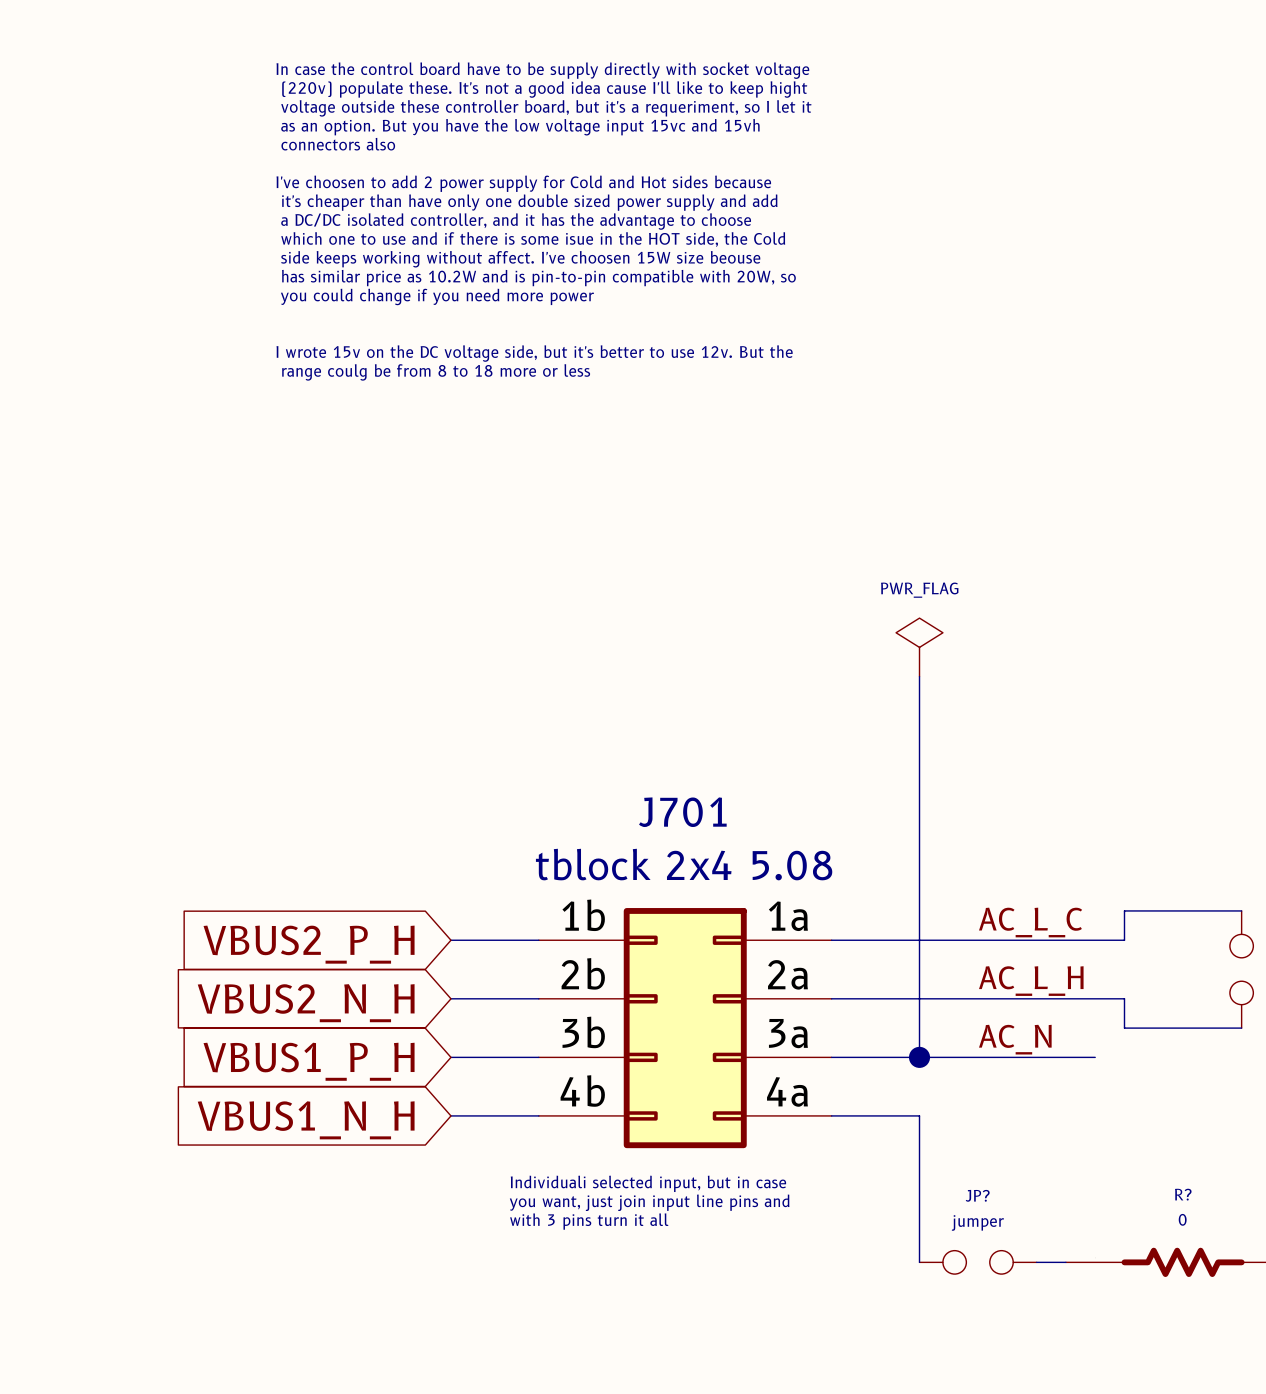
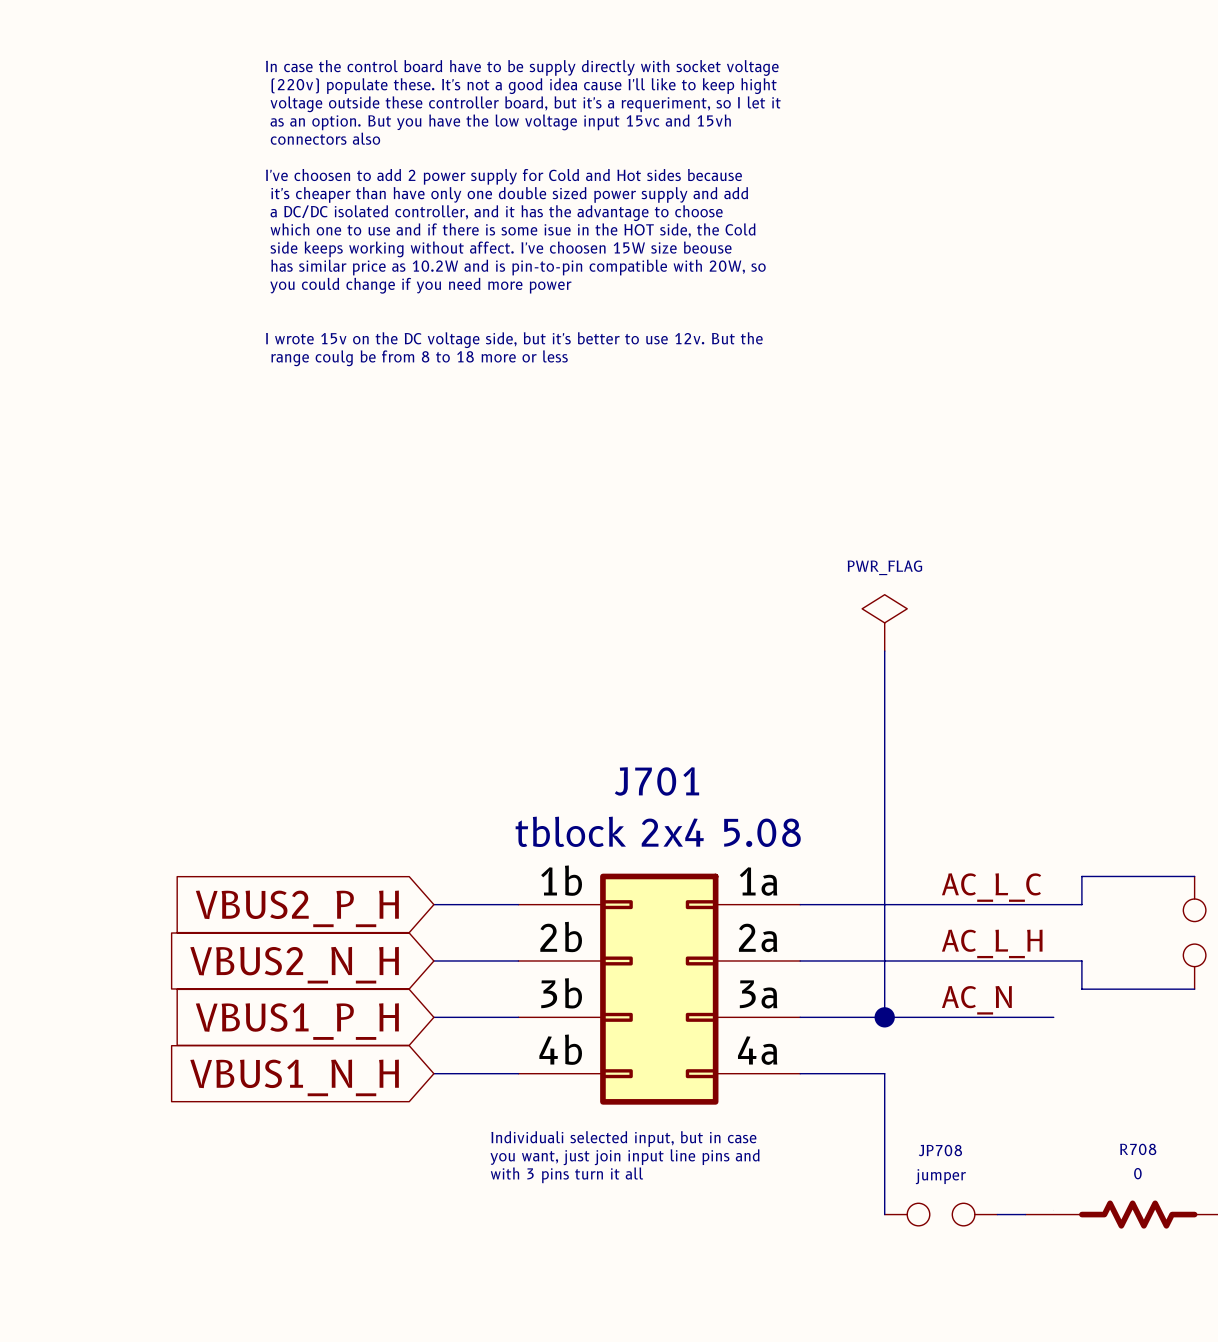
R? name: R? (1183, 1194) -> R708 (1138, 1149)
JP? name: JP? (977, 1195) -> JP708 (940, 1150)

